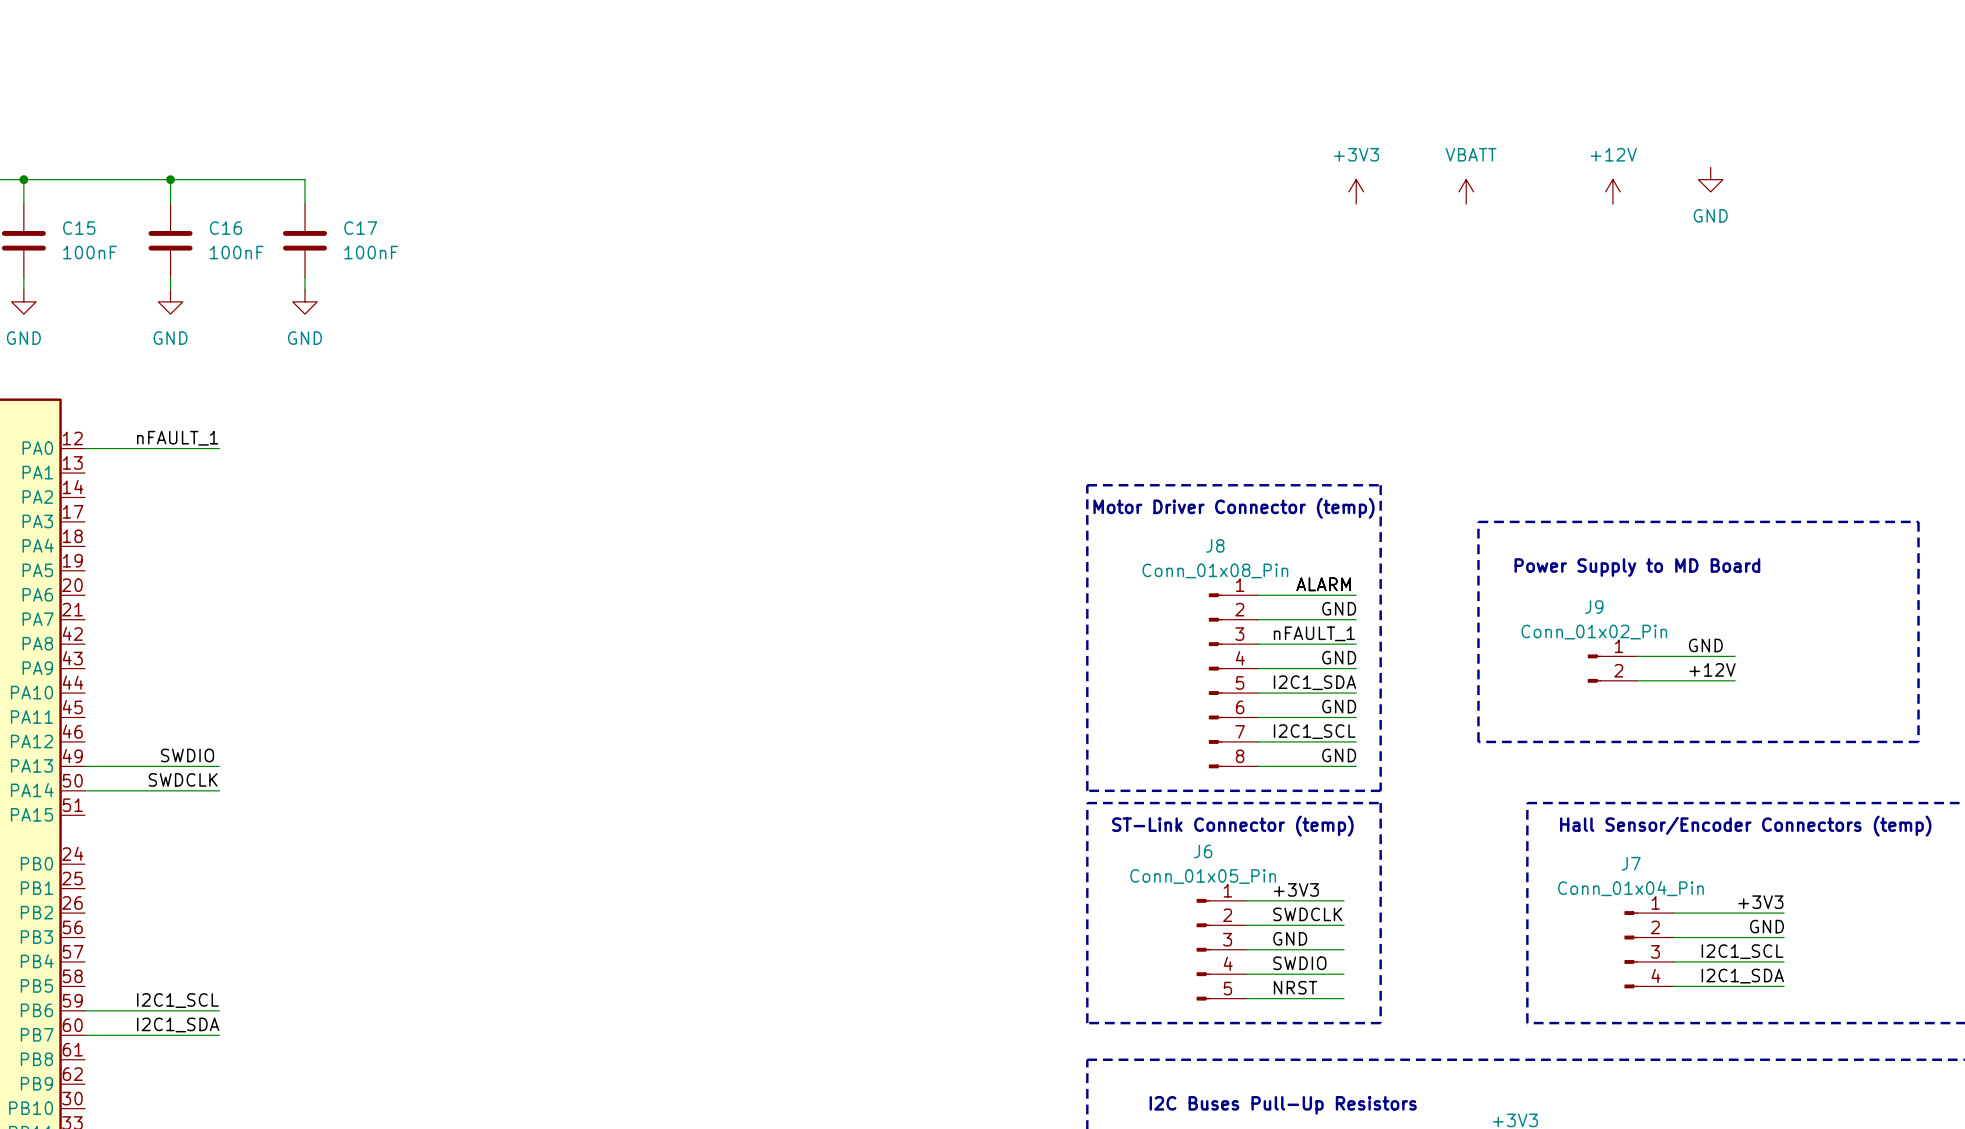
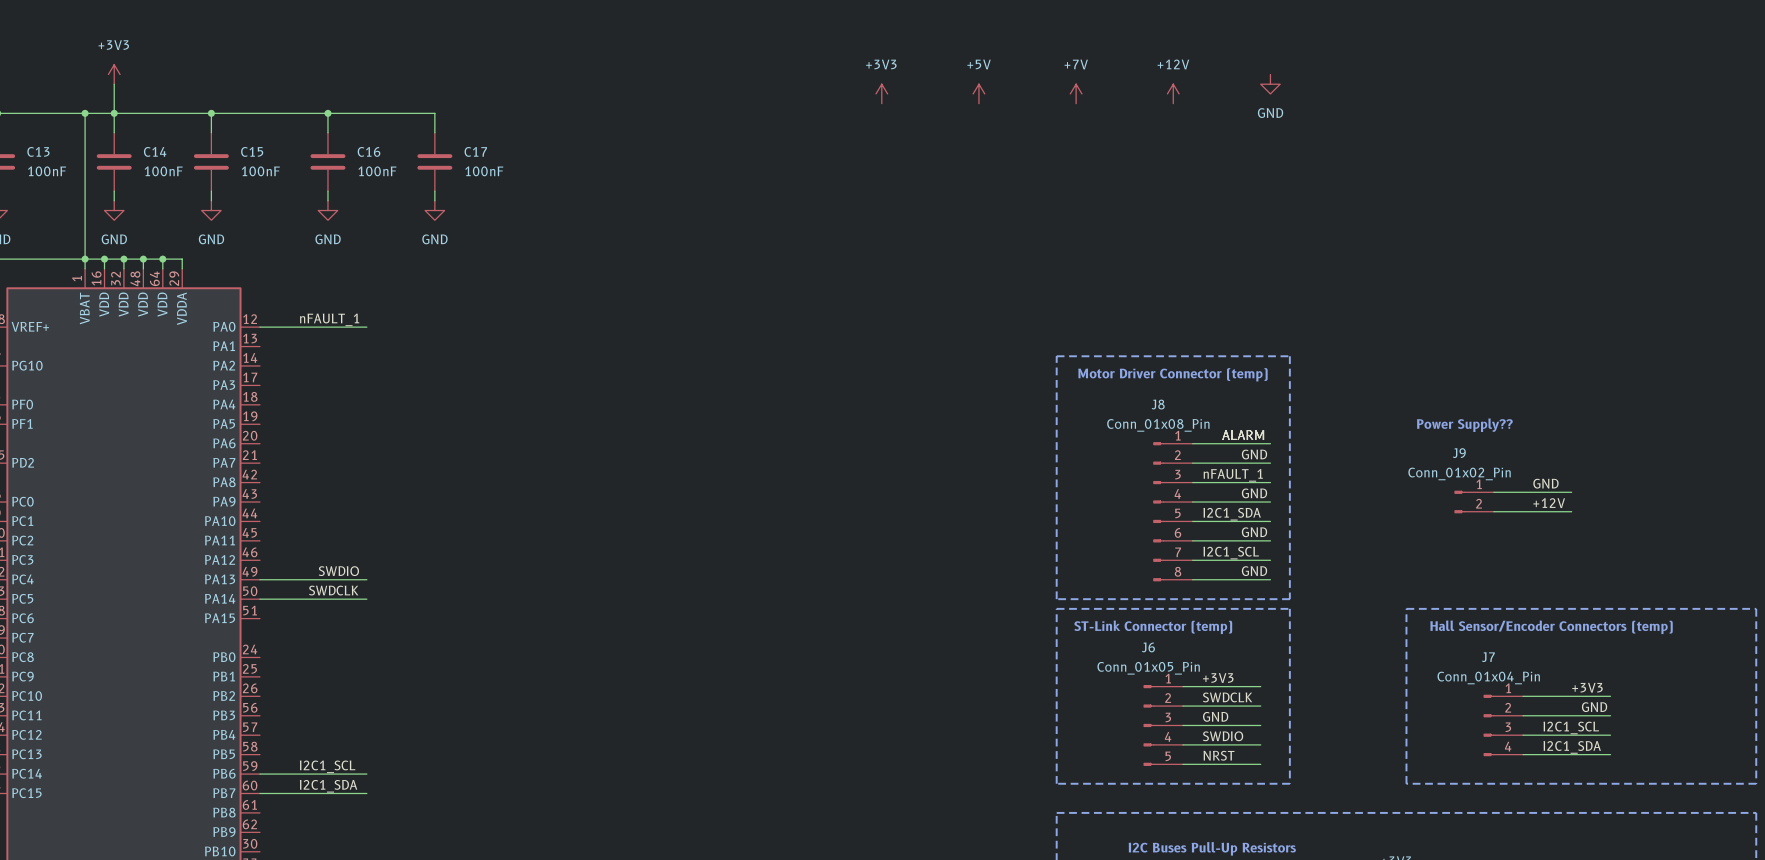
power symbol: none -> GND (1270, 84)
power symbol: none -> +3V3 (881, 93)
power symbol: none -> +5V (978, 93)
power symbol: none -> +7V (1076, 93)
power symbol: none -> +12V (1173, 93)
power symbol: GND (1710, 179) -> none
power symbol: +3V3 (1356, 191) -> none
power symbol: VBATT (1466, 191) -> none
power symbol: +12V (1612, 191) -> none
line: (1478, 521) (1918, 521) (1918, 741) (1478, 741) (1478, 521) -> none
text: Power Supply to MD Board (1637, 567) -> Power Supply?? (1464, 425)

